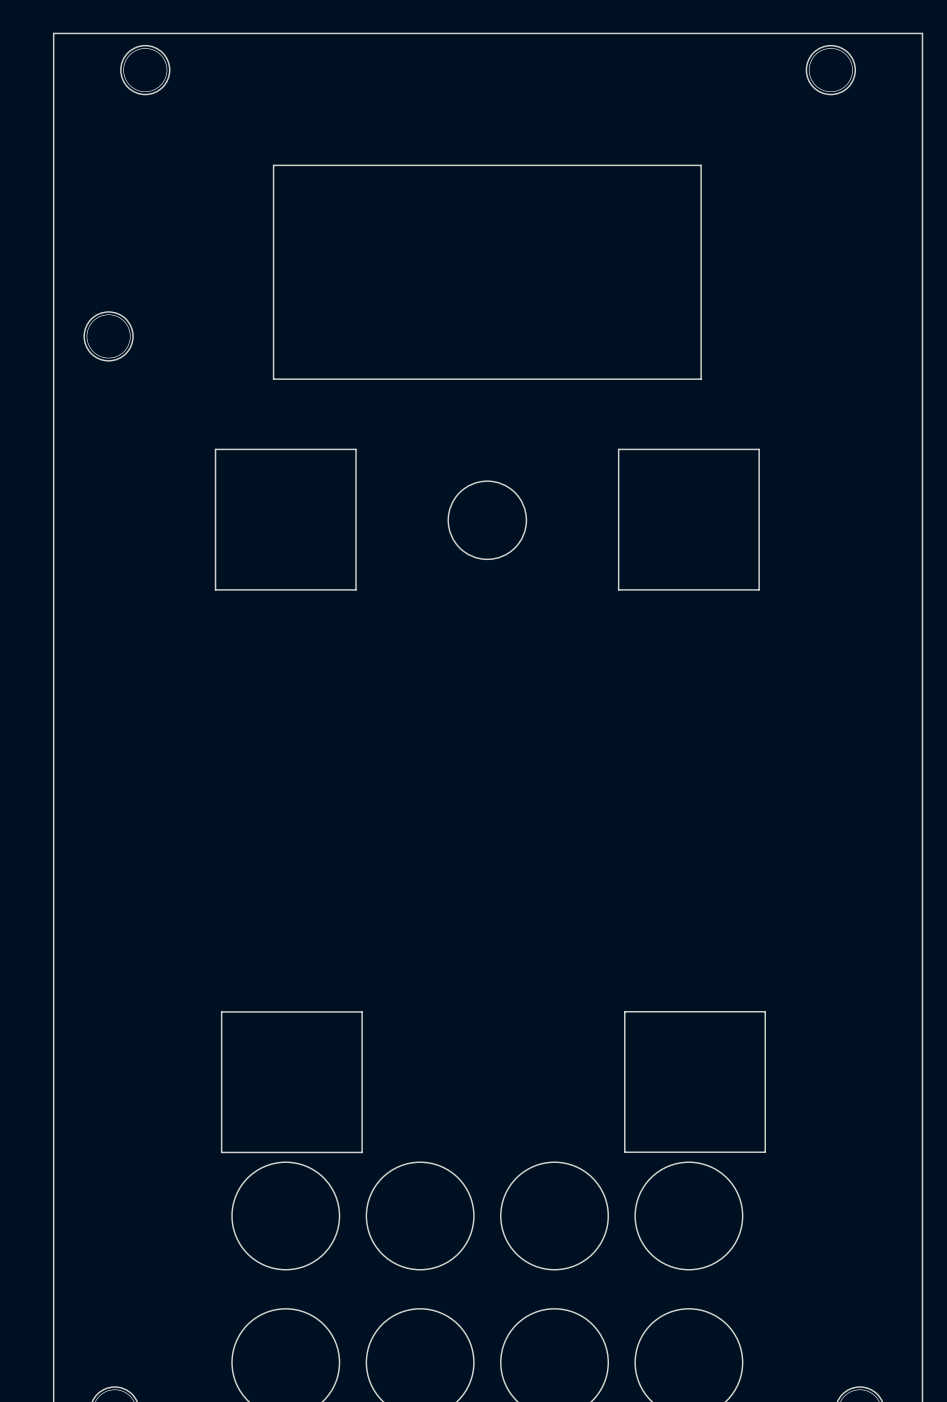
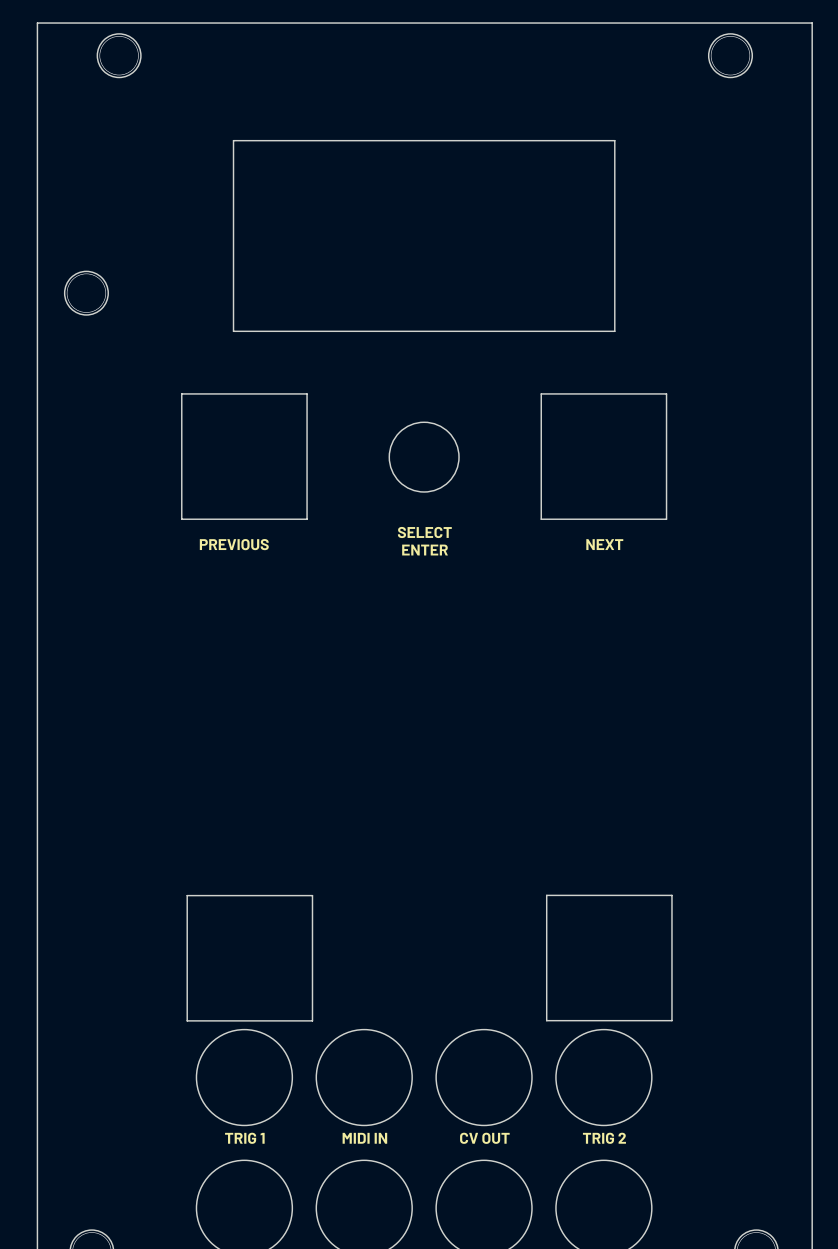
text: none -> SELECT (424, 532)
text: none -> PREVIOUS (234, 544)
text: none -> NEXT (604, 544)
text: none -> ENTER (425, 550)
text: none -> TRIG 1 (244, 1138)
text: none -> MIDI IN (364, 1138)
text: none -> CV OUT (484, 1138)
text: none -> TRIG 2 (604, 1138)

